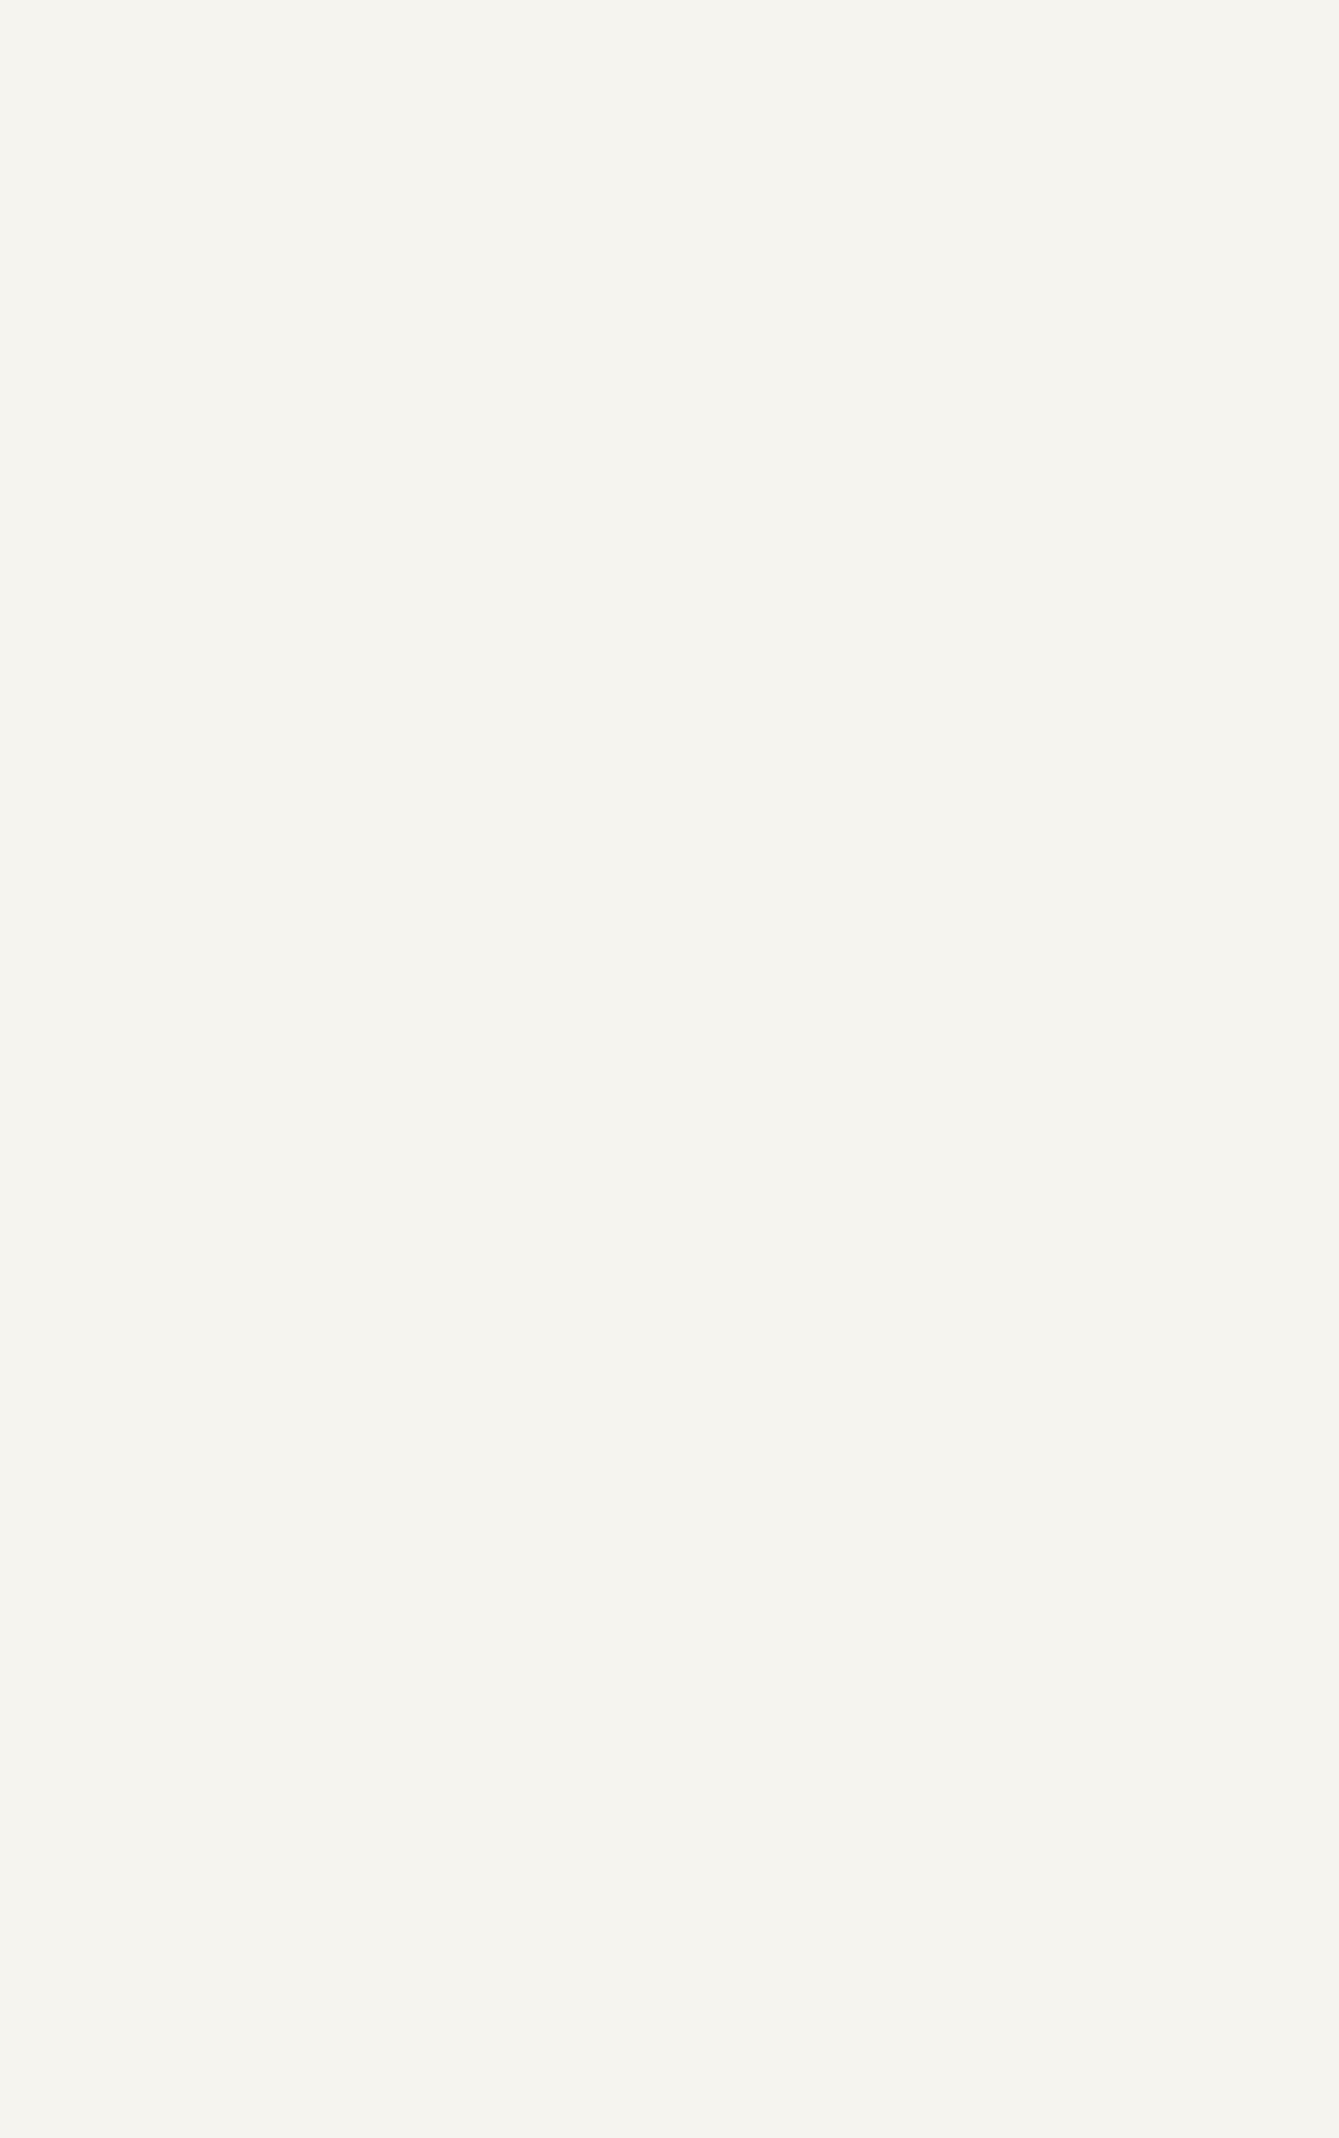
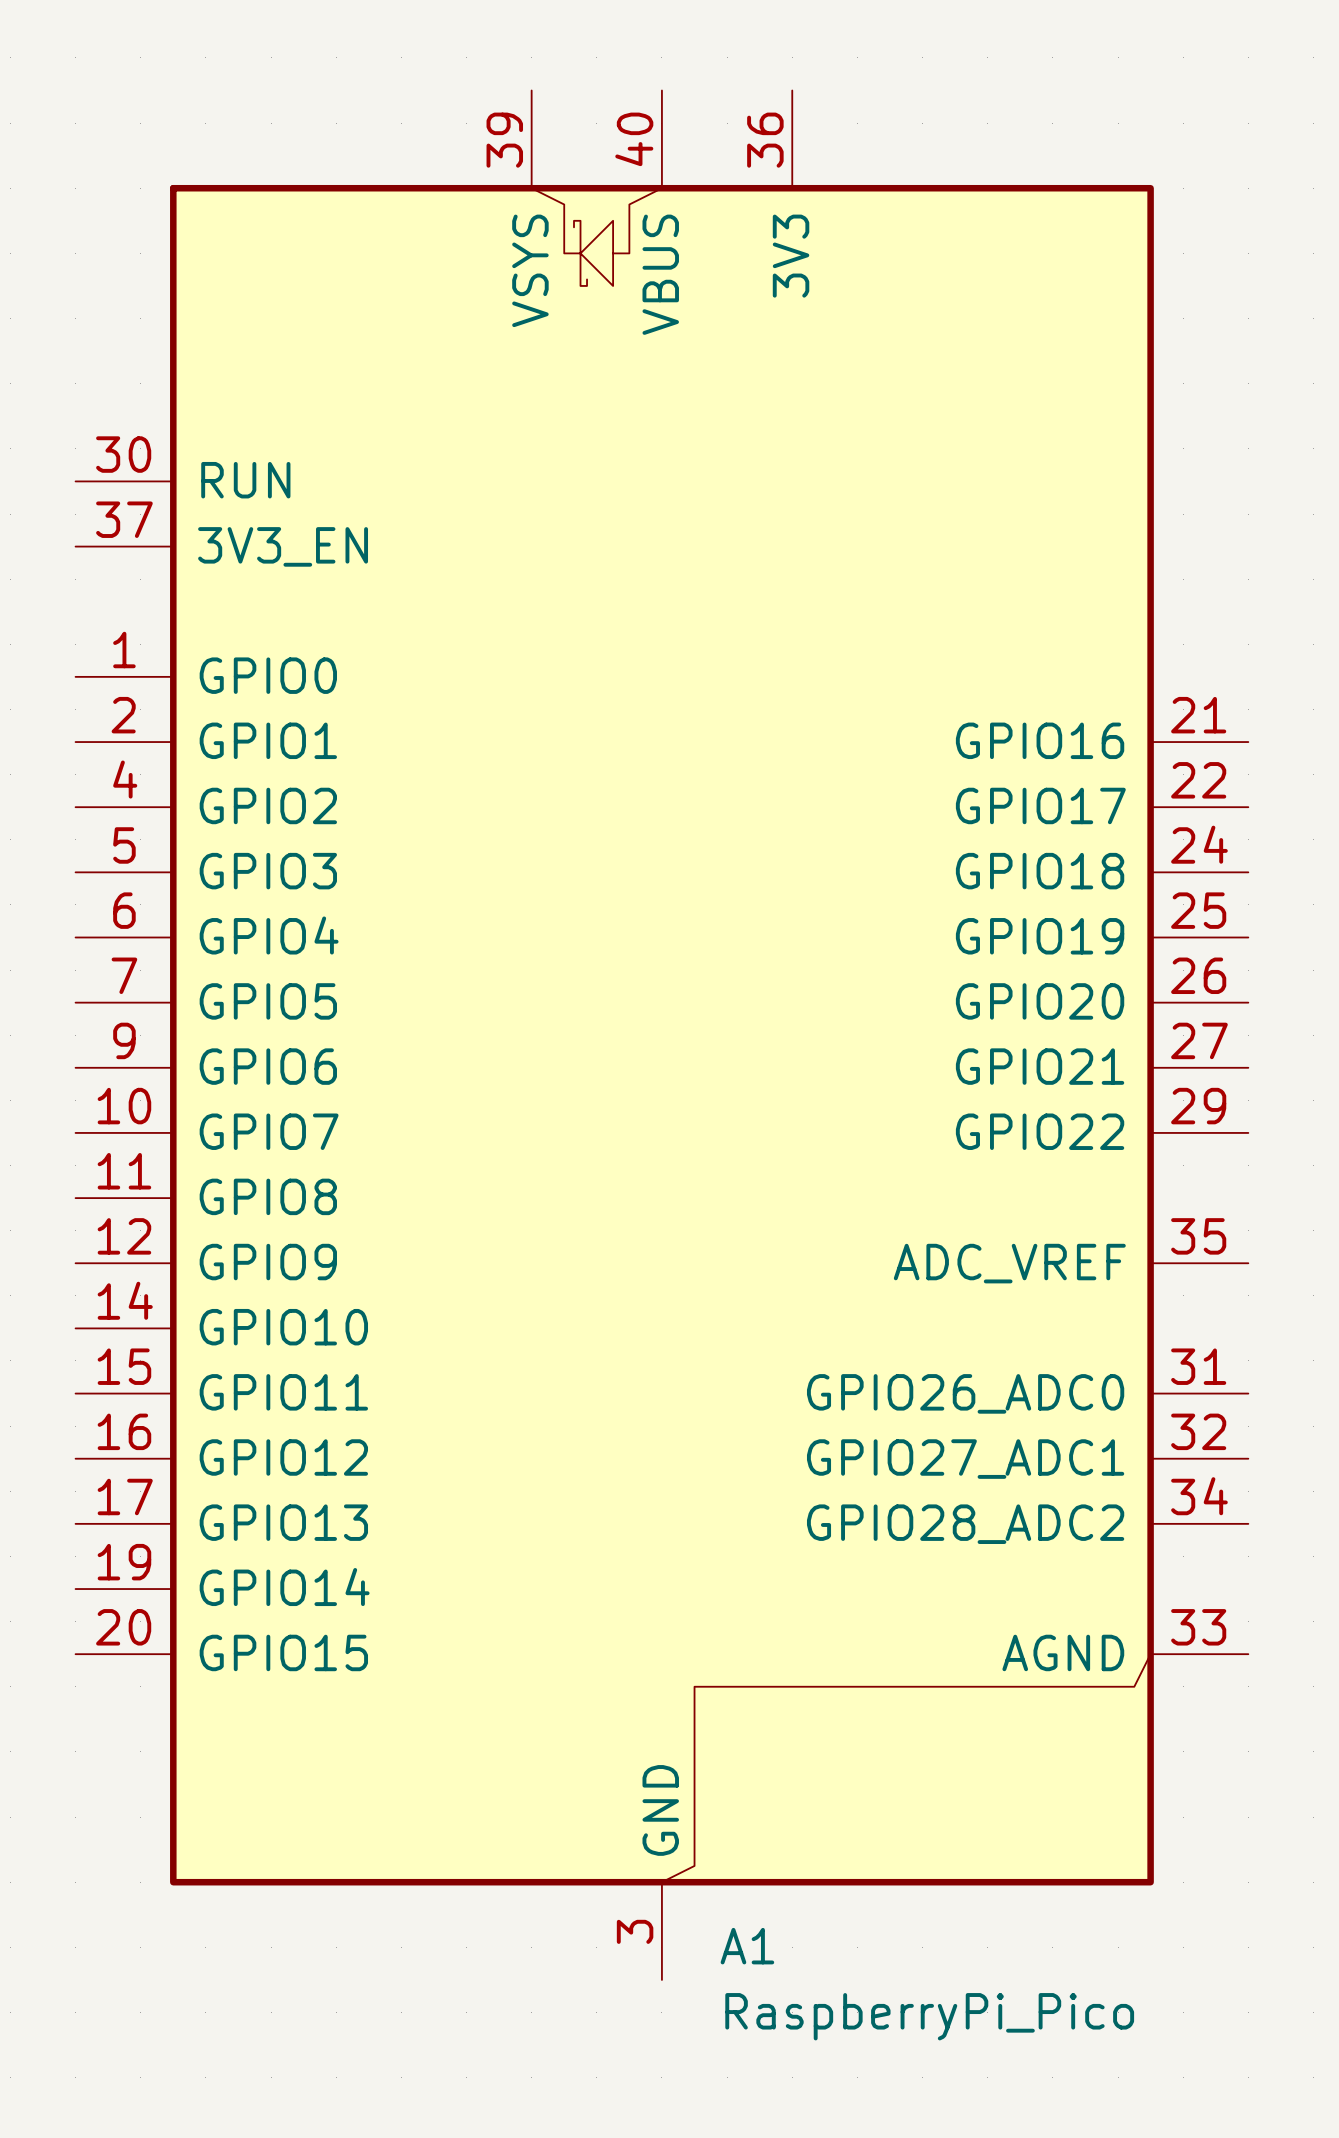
A1: none -> RaspberryPi_Pico (661, 1035)

